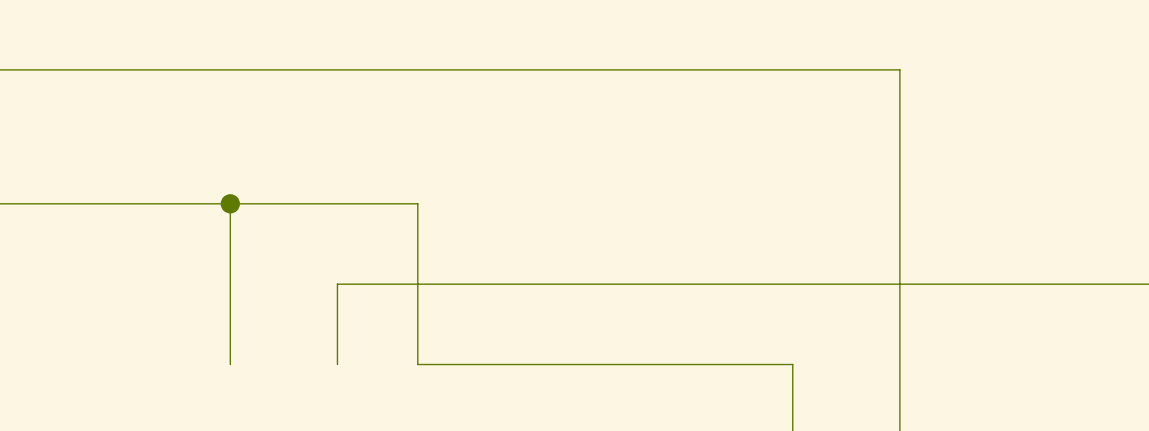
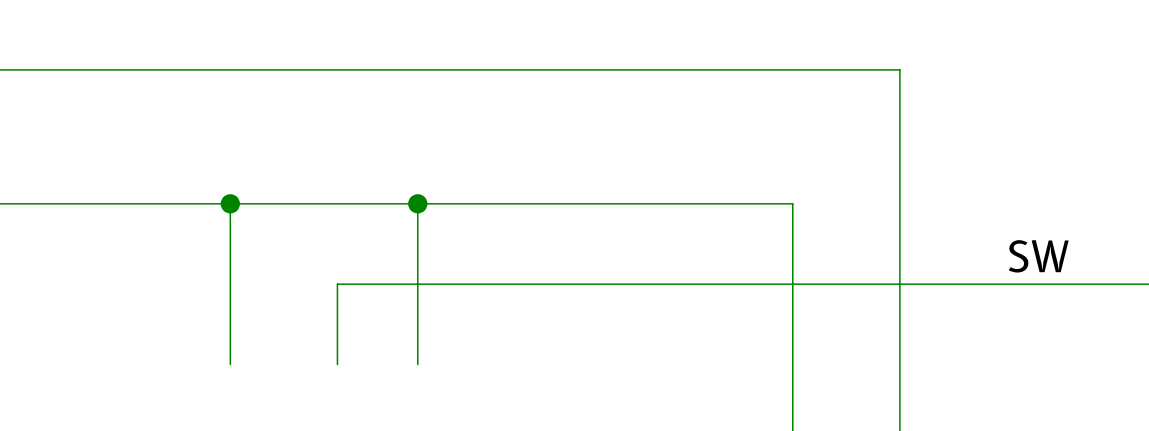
junction: none -> (417, 203)
label: none -> SW (1038, 256)
wire: (417, 364) (792, 364) -> (417, 203) (792, 203) (792, 364)

